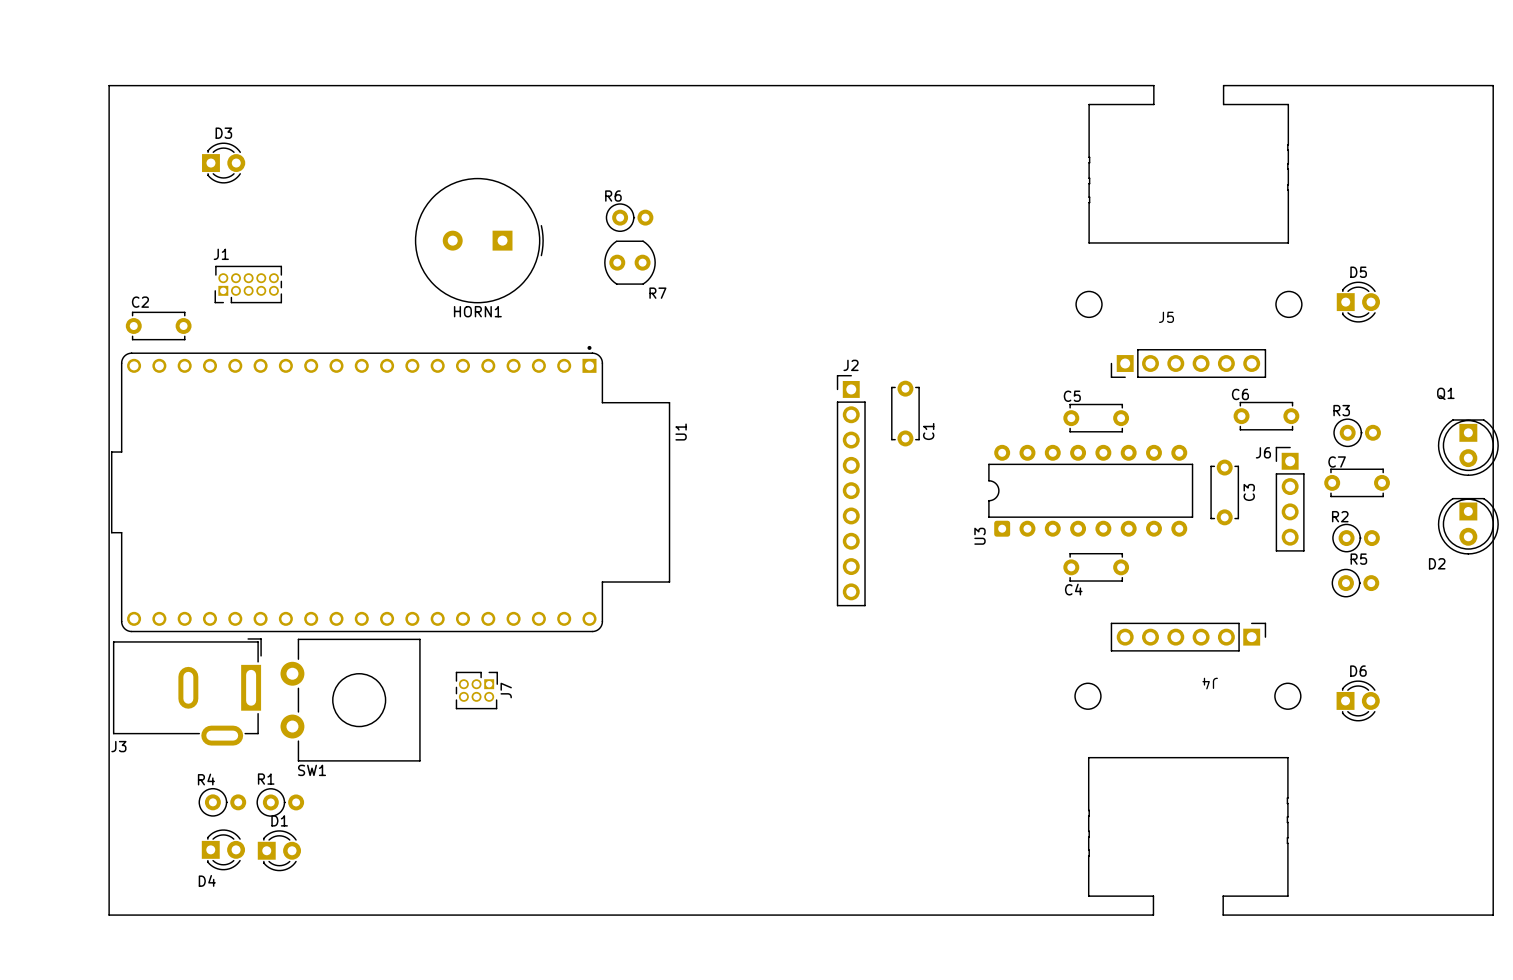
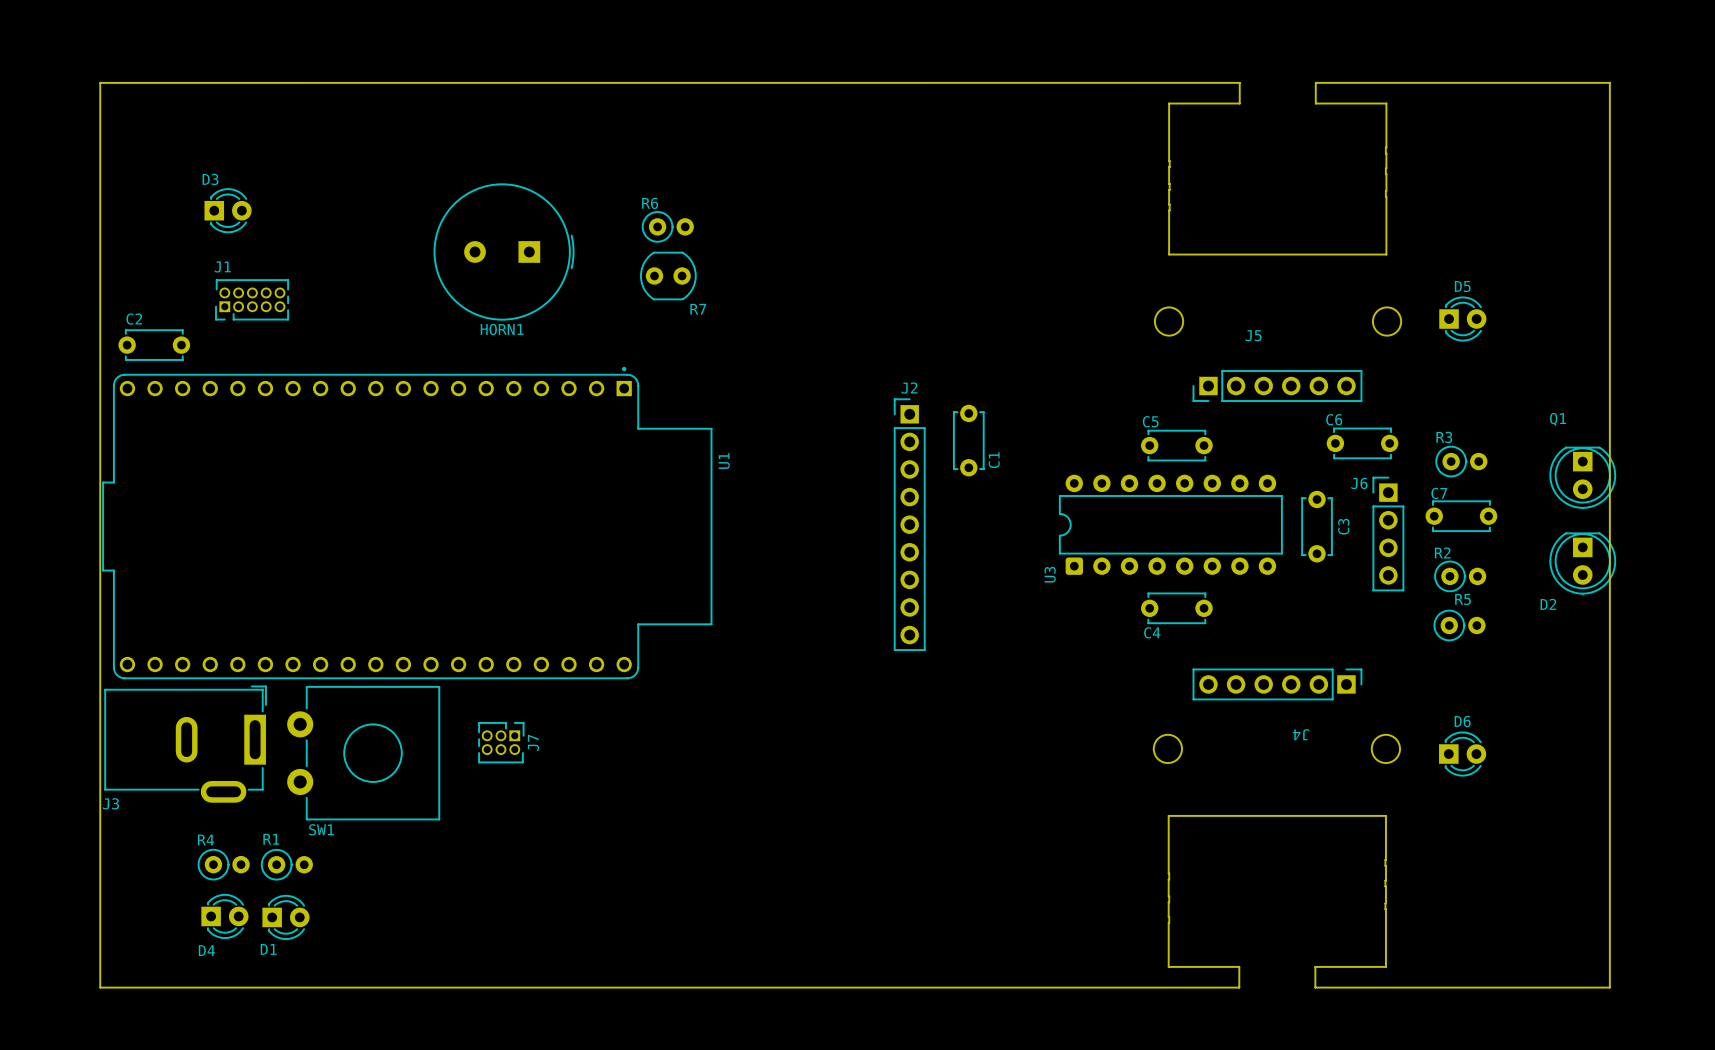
D3 name position: D3 (223, 133) -> D3 (210, 179)
D3 position: (223, 163) -> (228, 210)
D1 name position: D1 (279, 820) -> D1 (268, 949)

